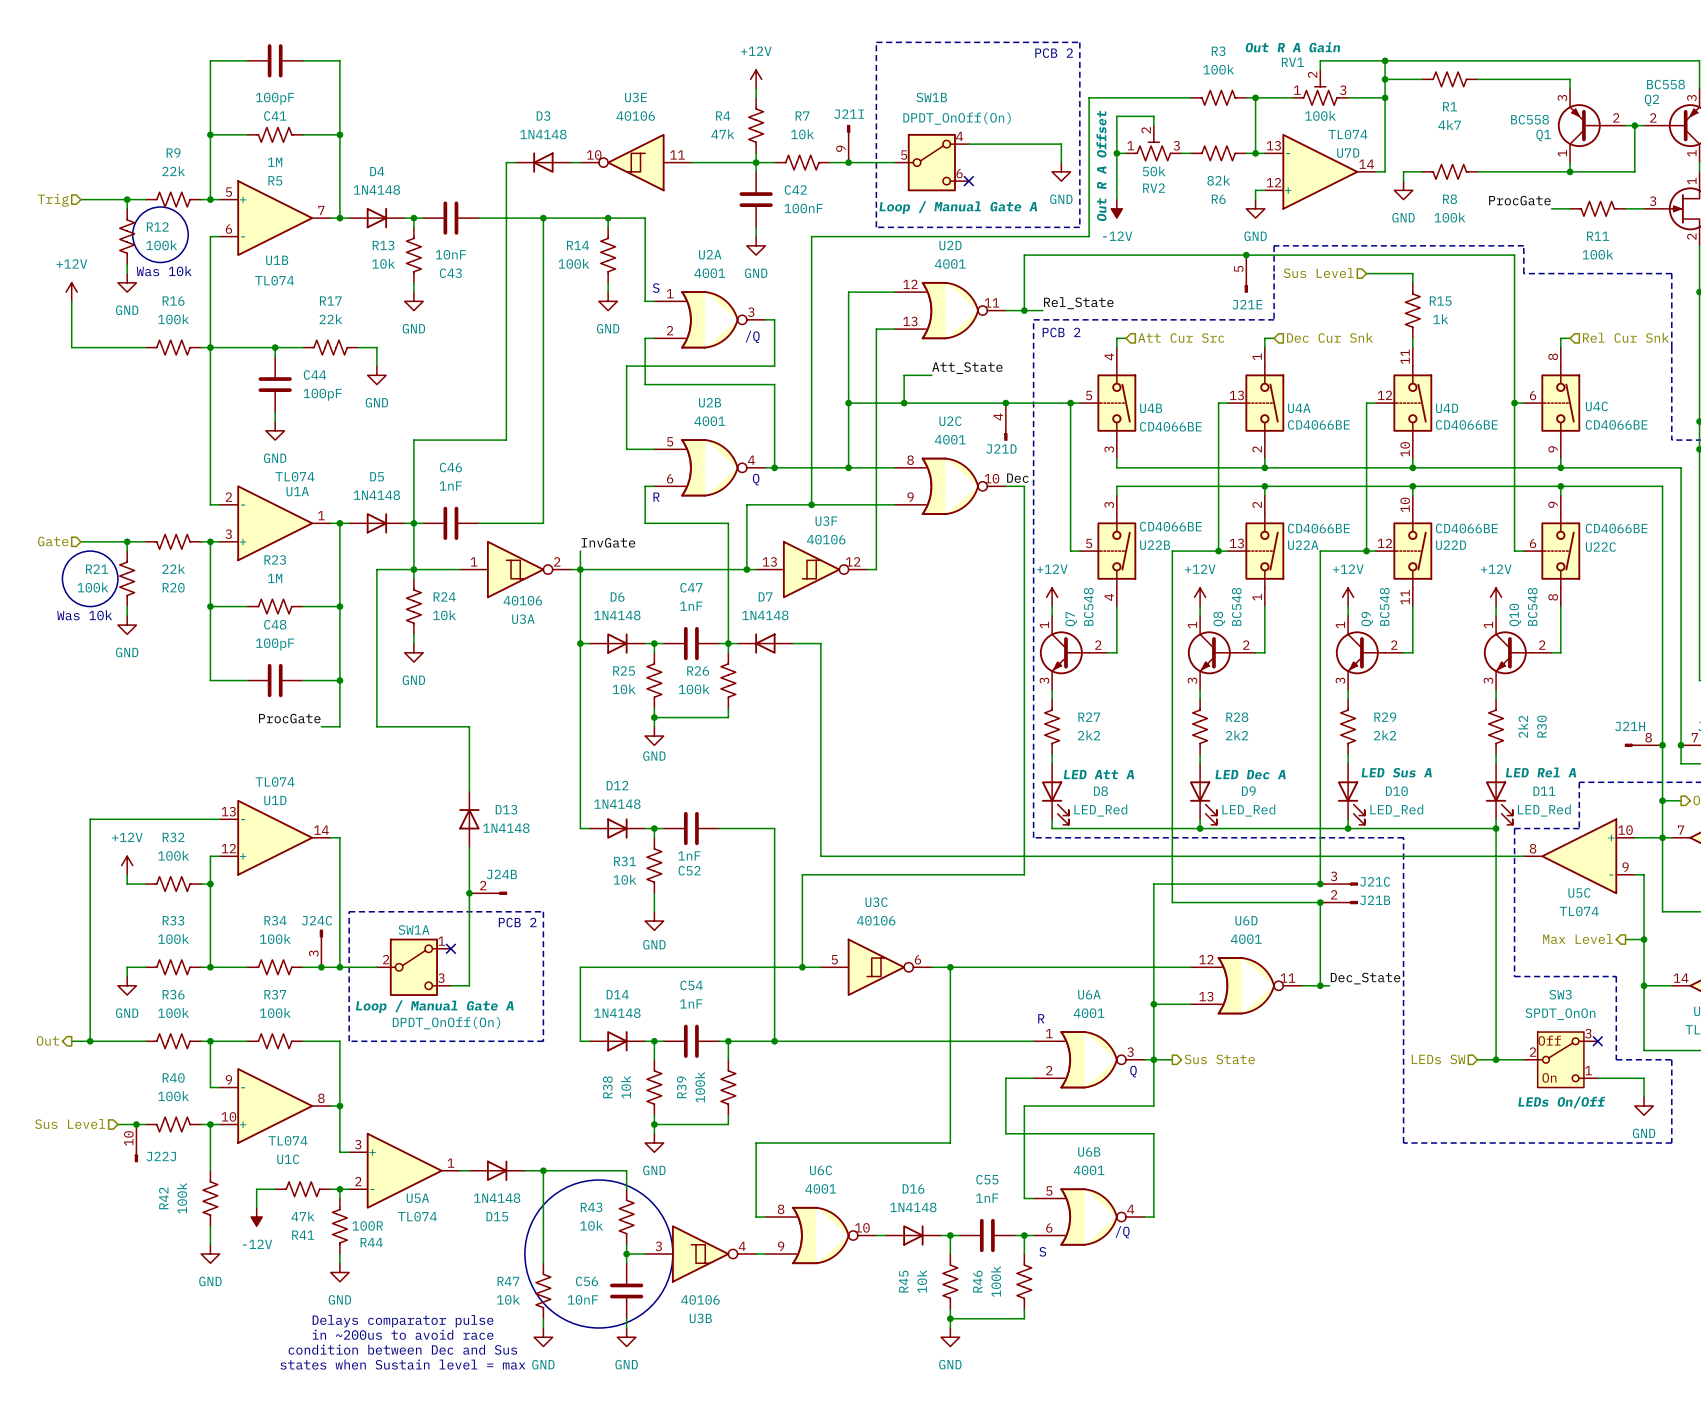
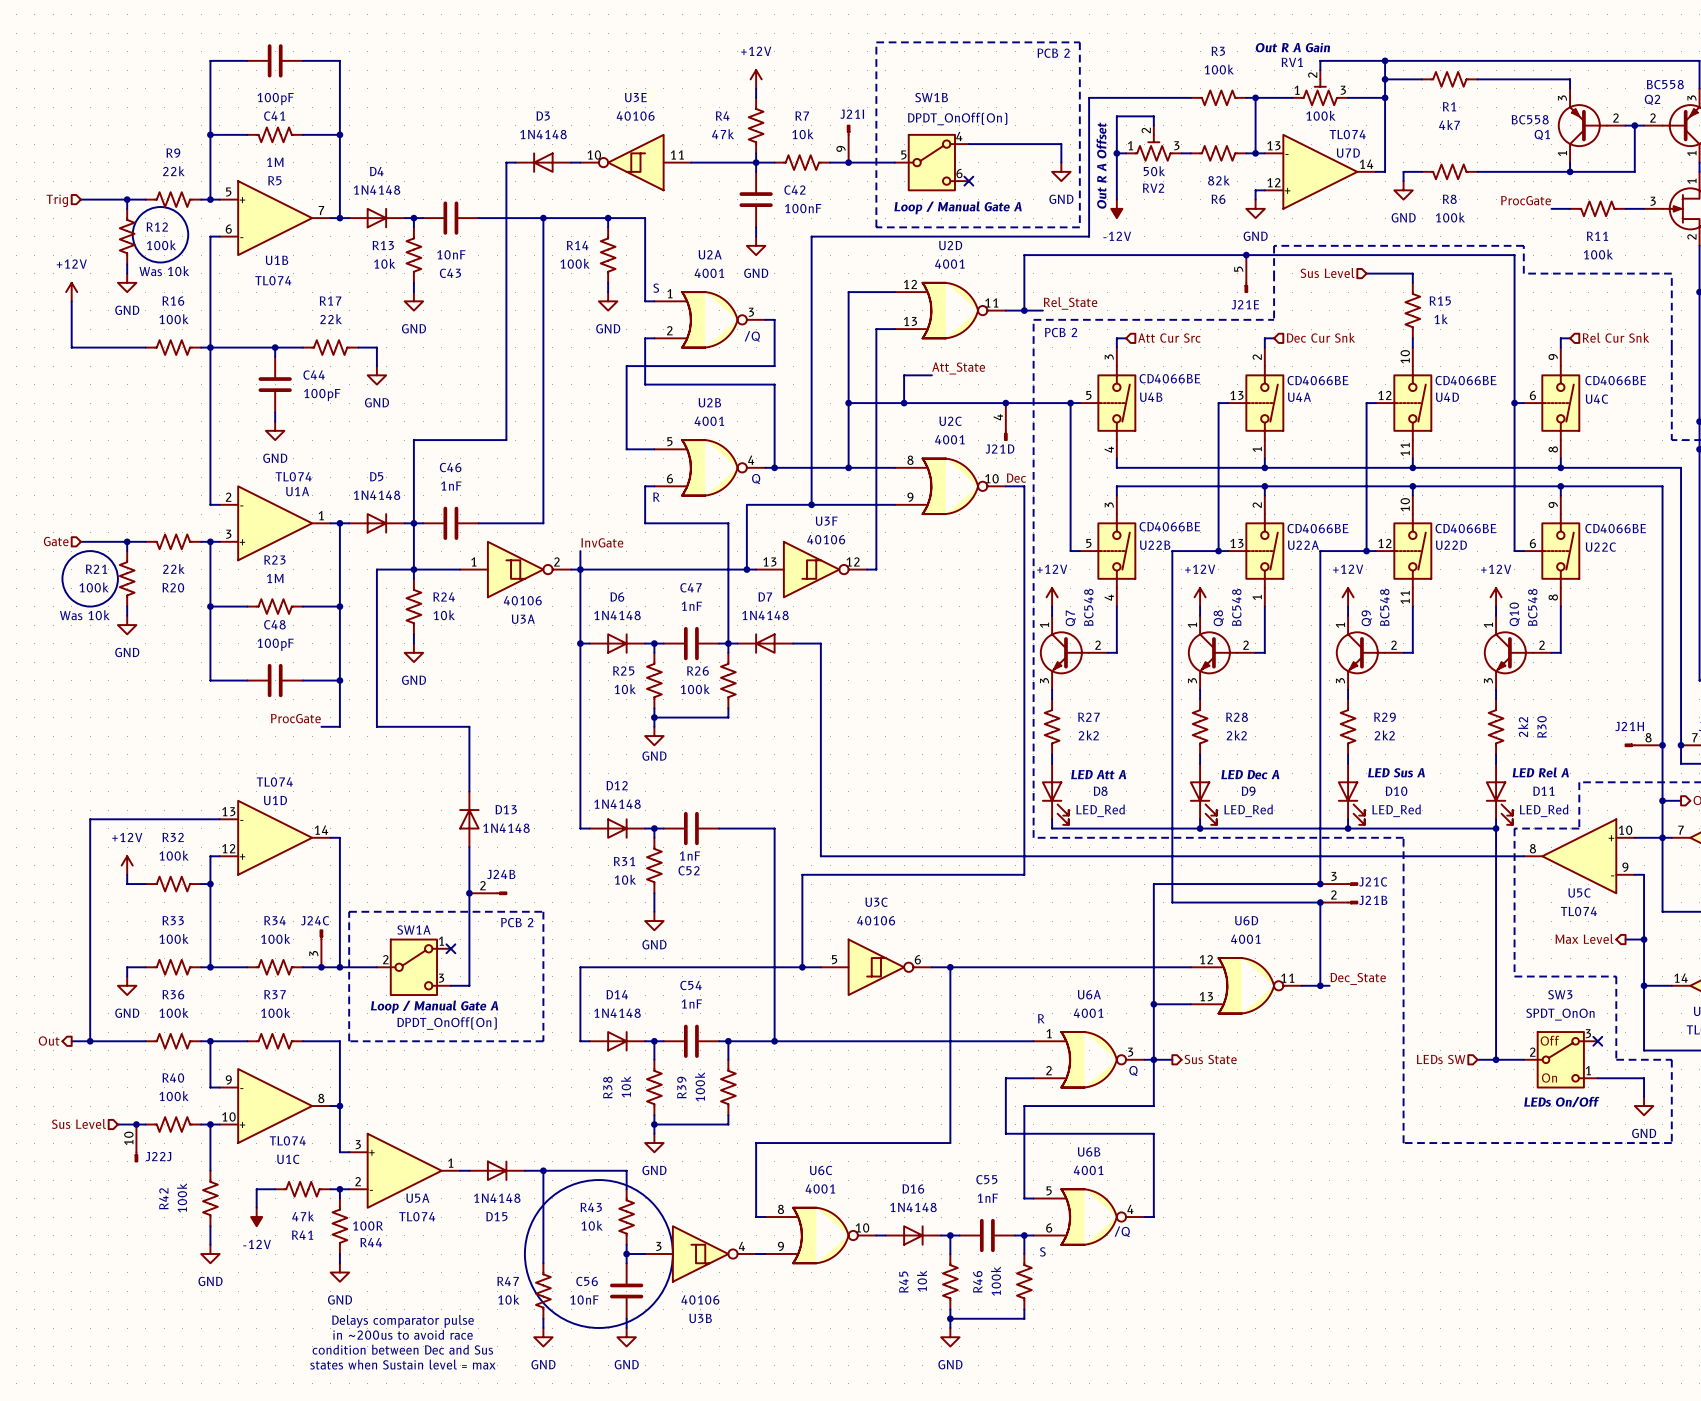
U4B flip: as is (1116, 403) -> up-down (1116, 403)
U4A flip: as is (1264, 403) -> up-down (1264, 403)
U4D flip: as is (1412, 403) -> up-down (1412, 403)
U4C flip: as is (1560, 403) -> up-down (1560, 403)

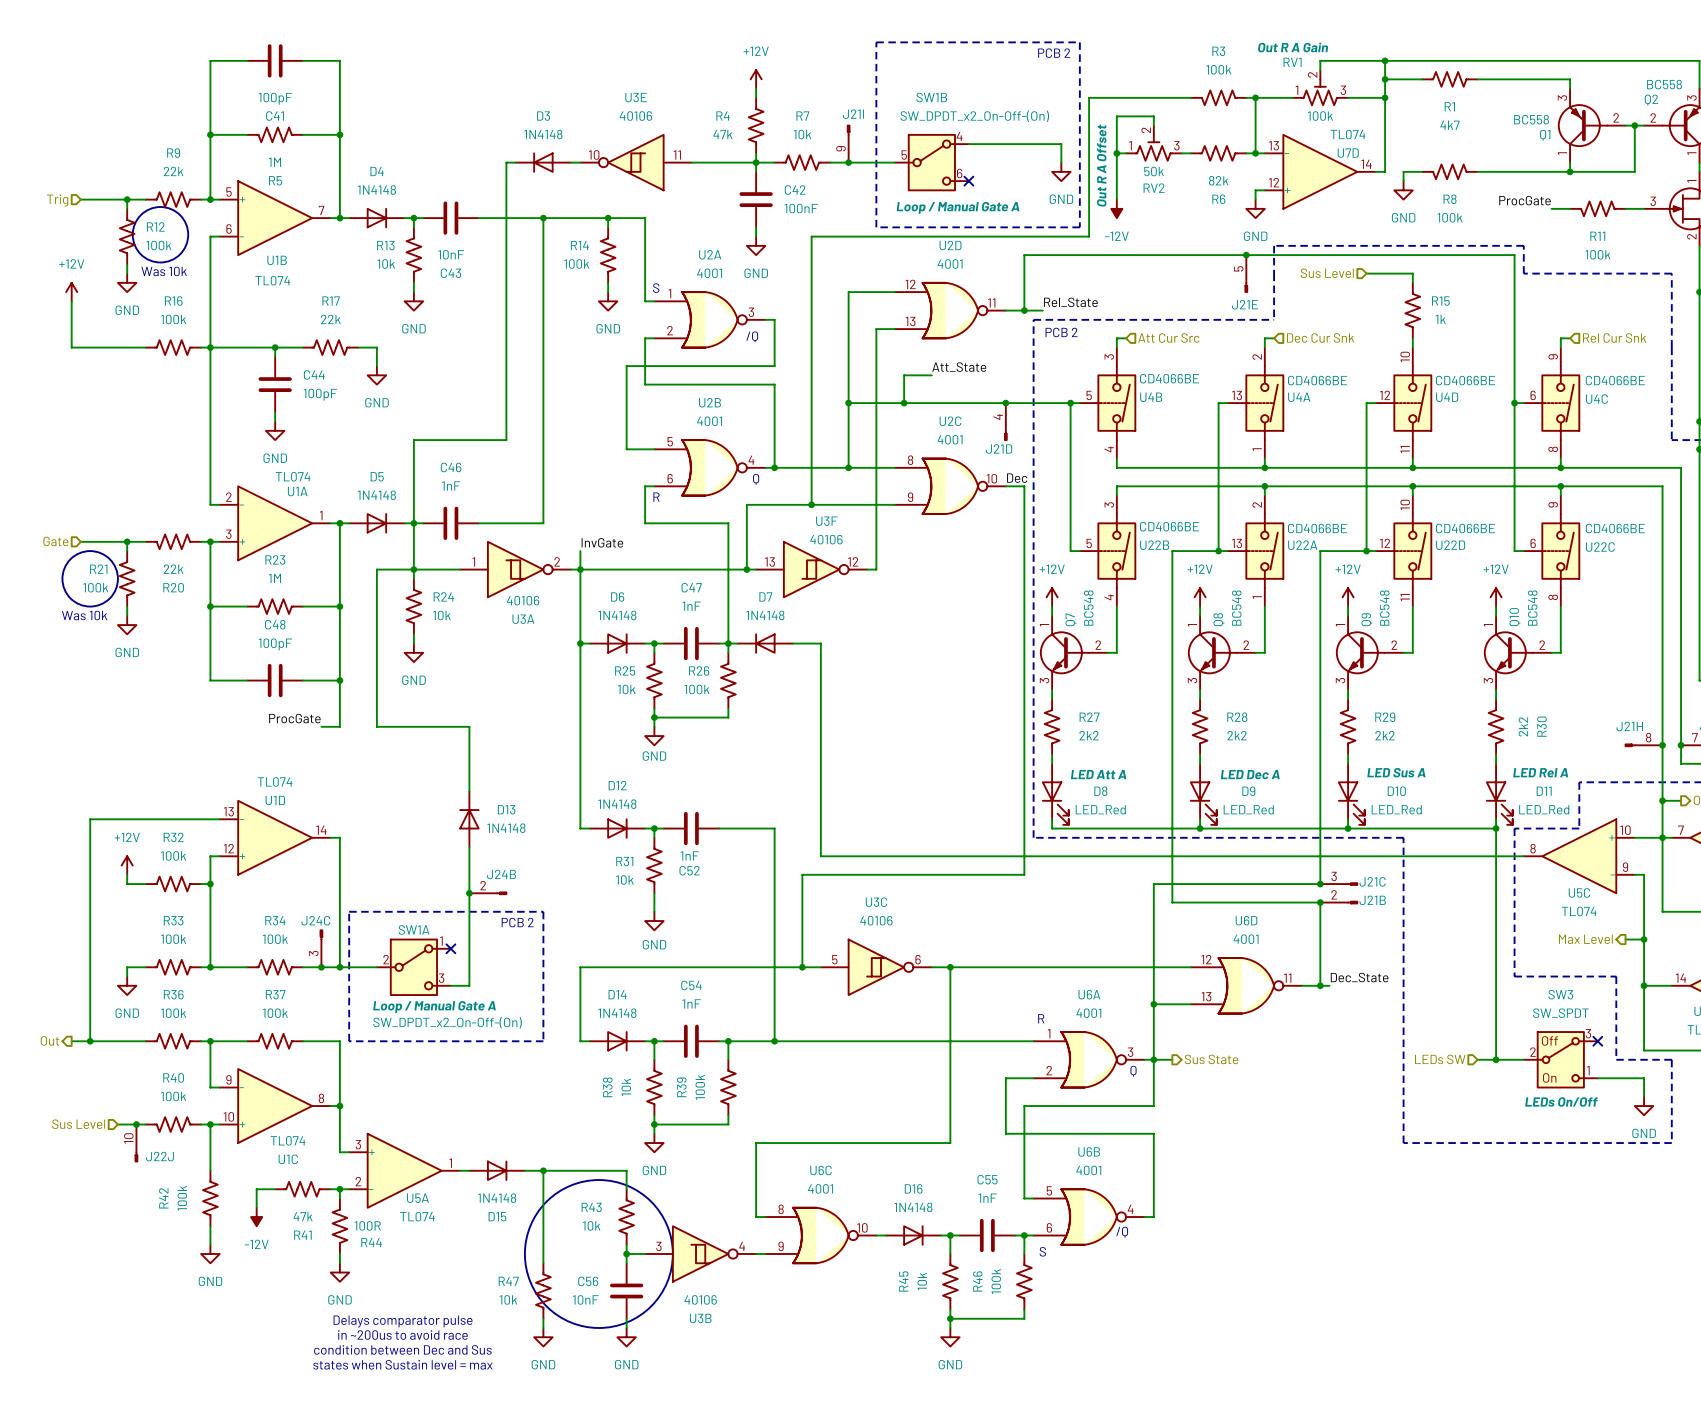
SW1B value: DPDT_OnOff(On) (957, 118) -> SW_DPDT_x2_On-Off-(On) (974, 116)
SW3 value: SPDT_OnOn (1560, 1014) -> SW_SPDT (1560, 1013)
SW1A value: DPDT_OnOff(On) (447, 1023) -> SW_DPDT_x2_On-Off-(On) (447, 1022)

